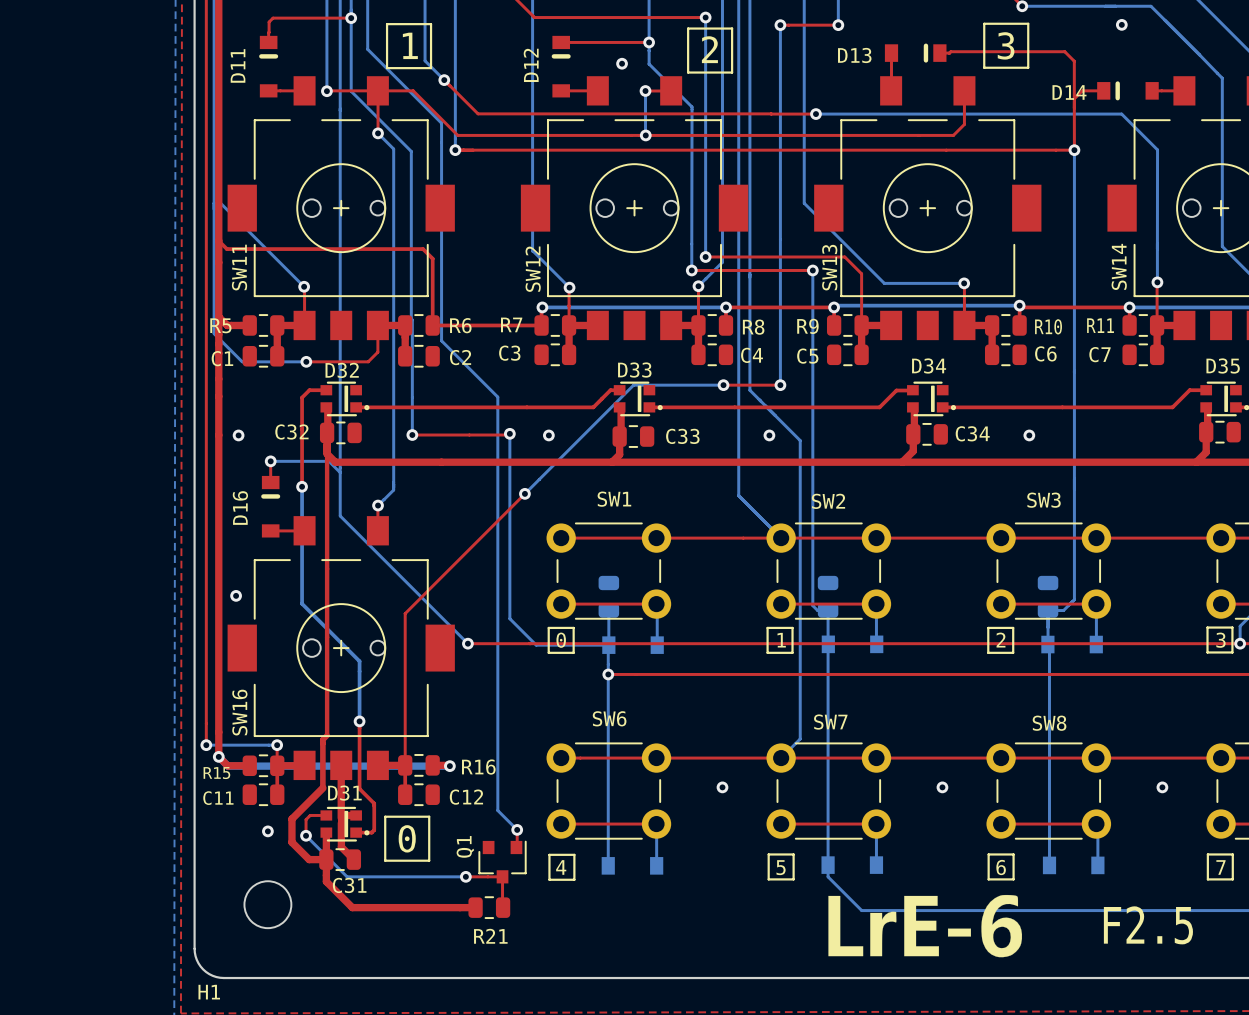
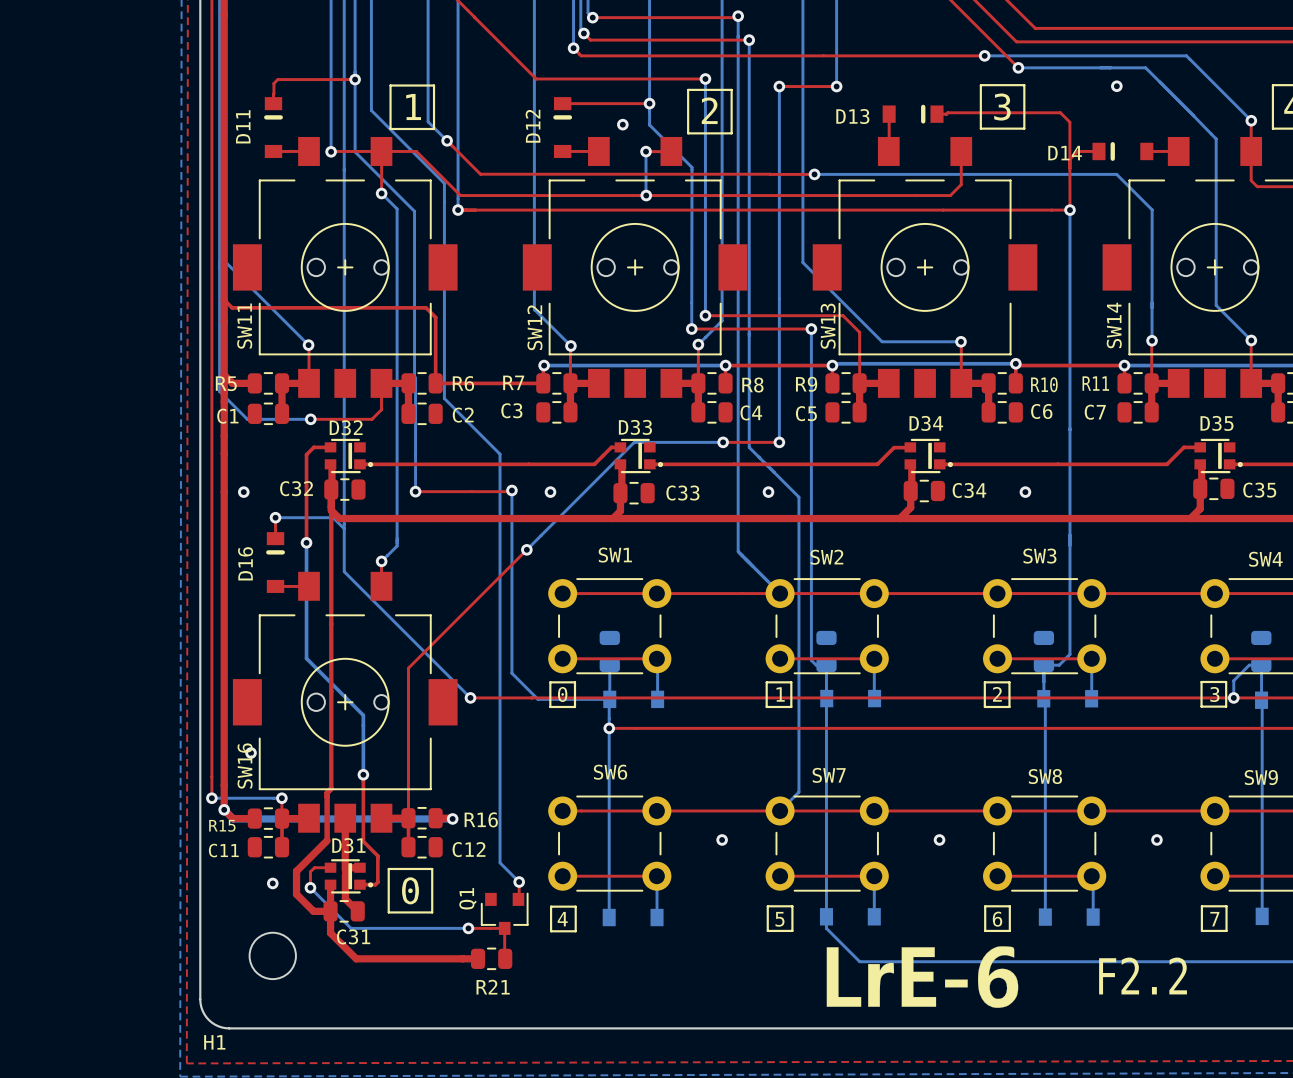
via: (236, 595) -> none
via: none -> (251, 753)
text: F2.5 (1148, 925) -> F2.2 (1143, 975)

